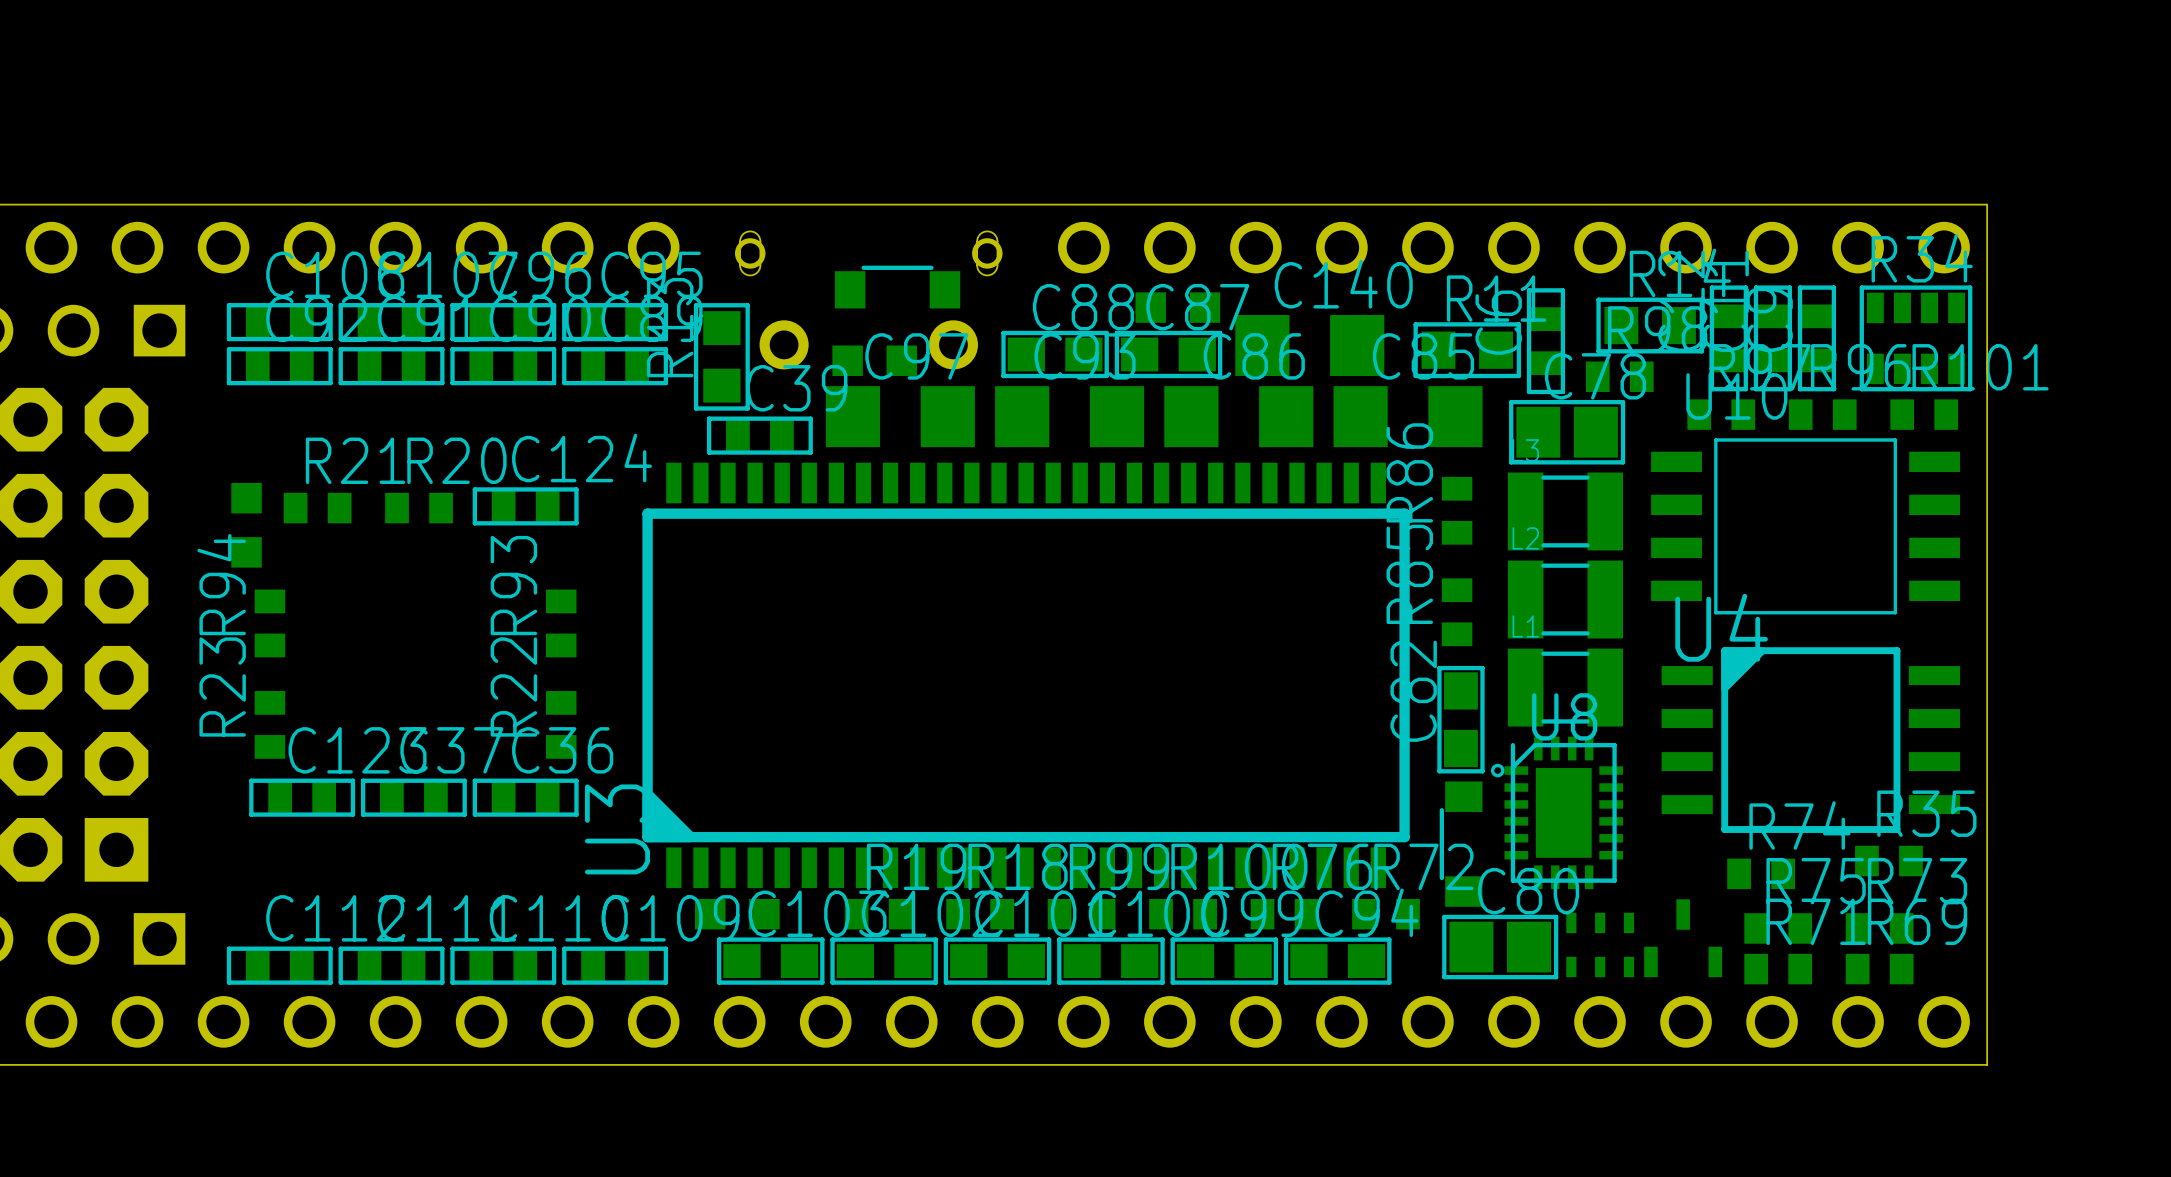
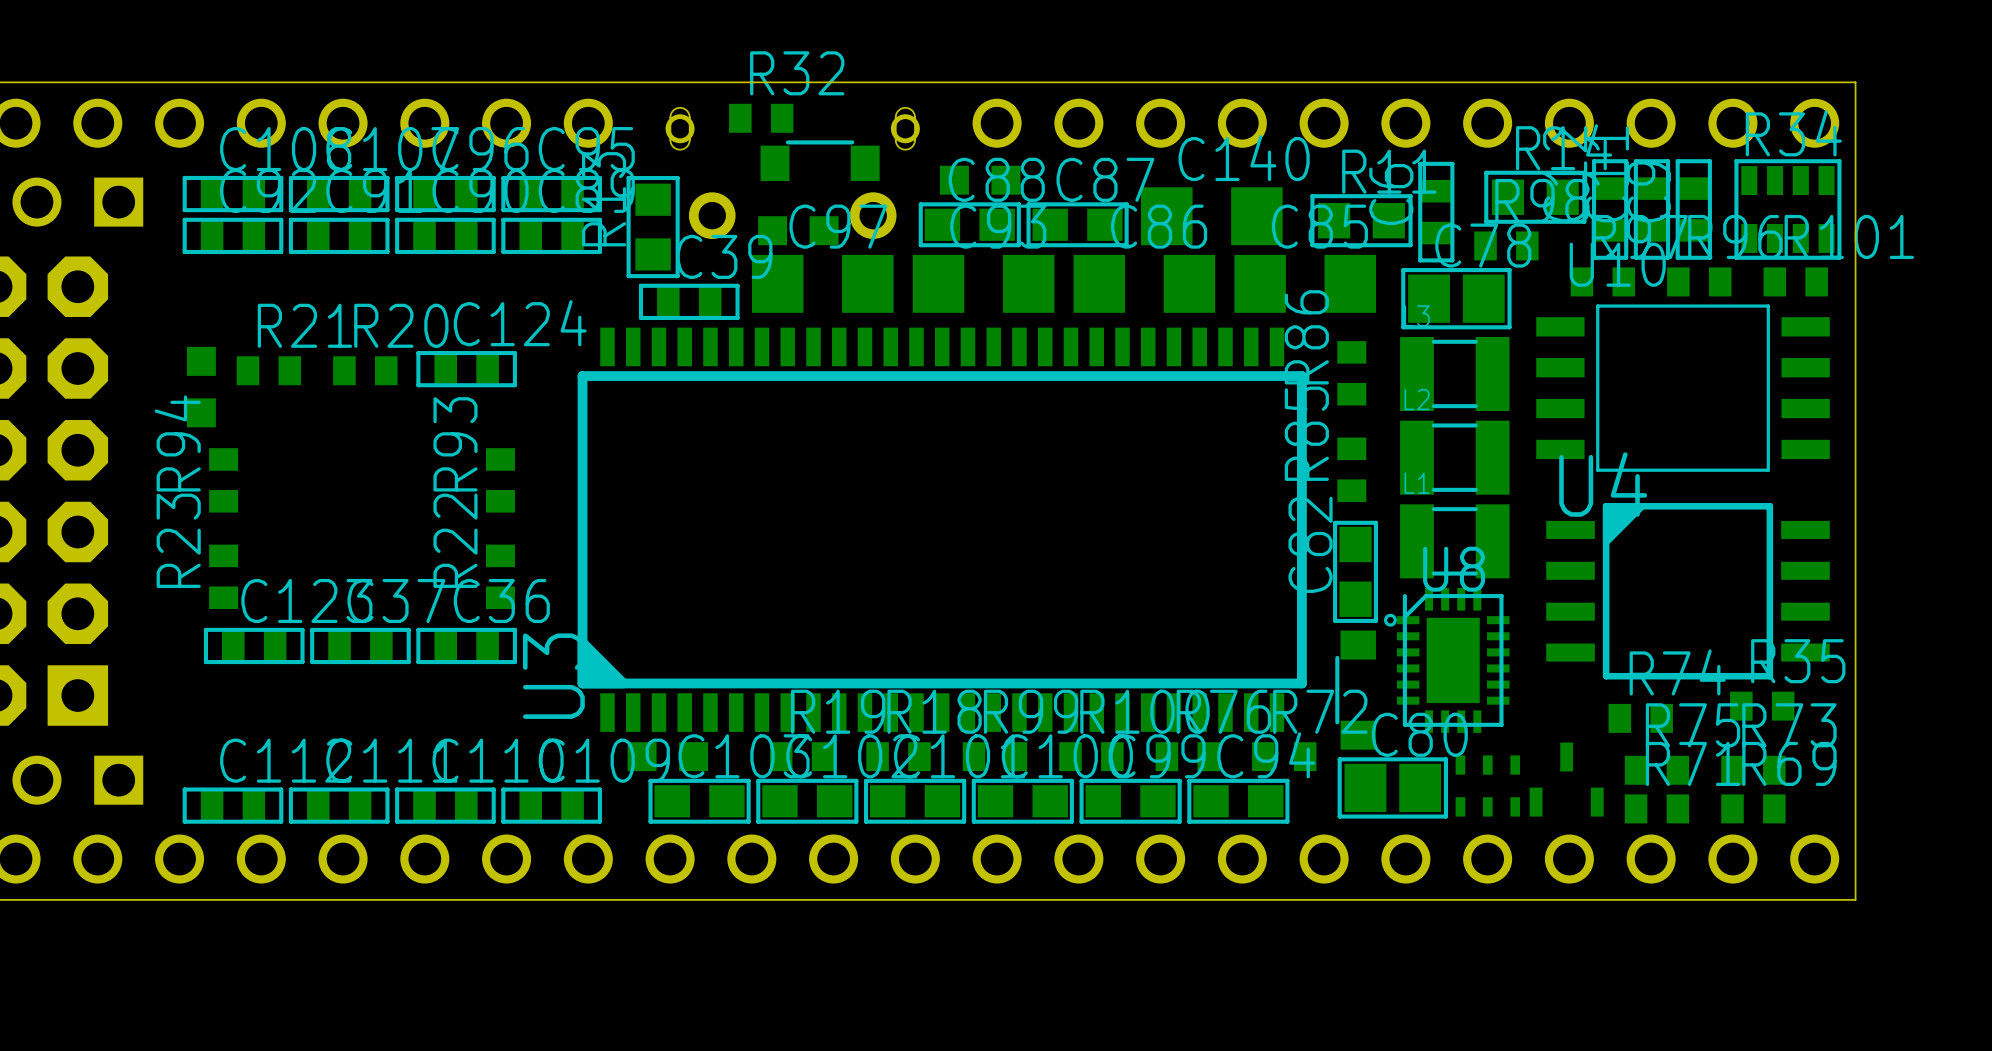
R32: none -> (761, 118)
part position: (1177, 307) -> (980, 180)

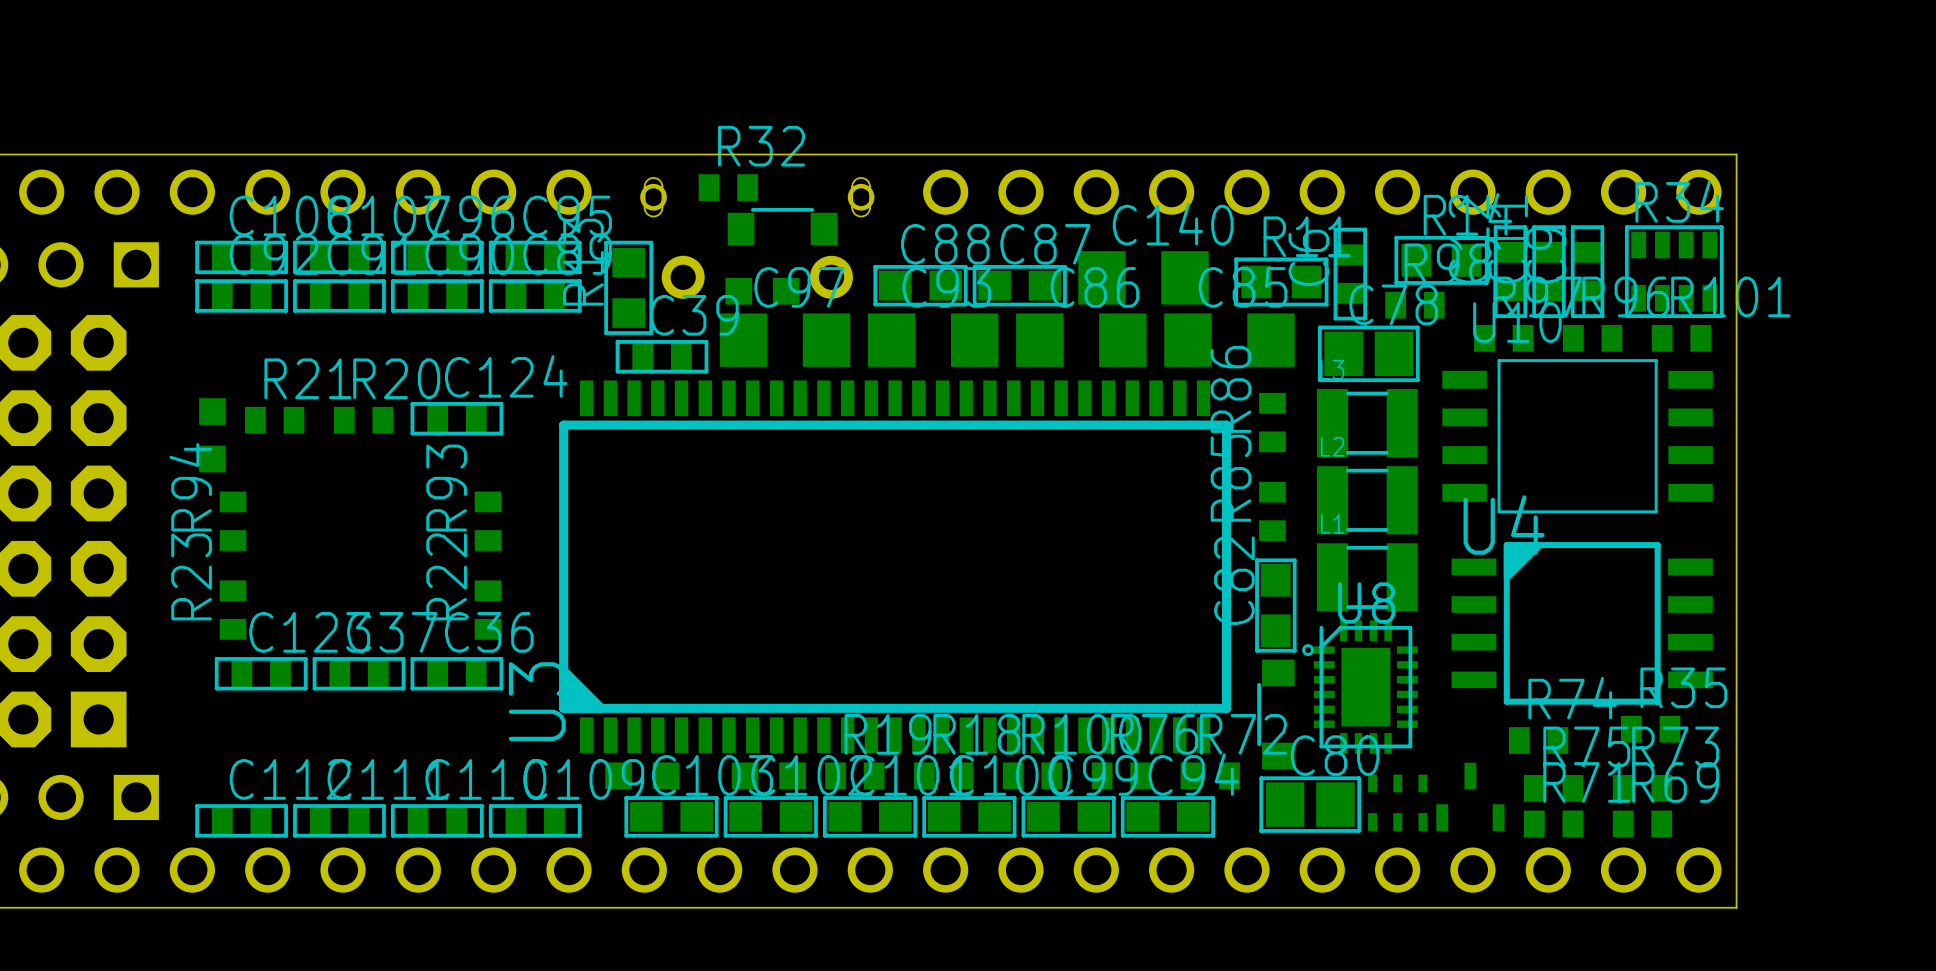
part position: (980, 180) -> (768, 775)
R18 name: R18 (934, 711) -> R19 (888, 734)
R99 name: R99 (1031, 711) -> R18 (976, 734)
R19: (802, 756) -> none

